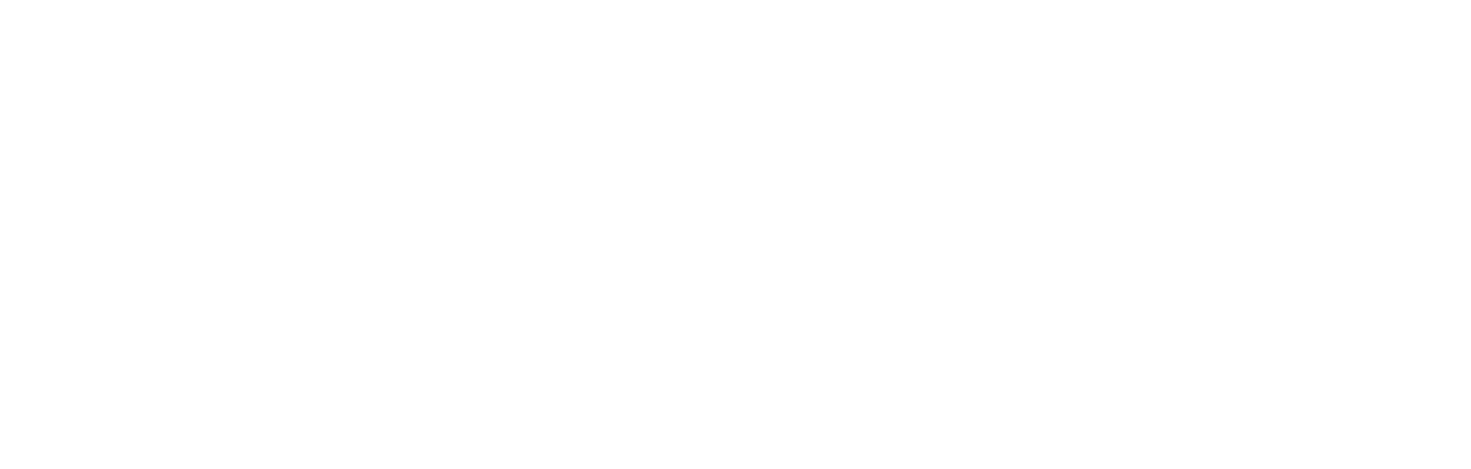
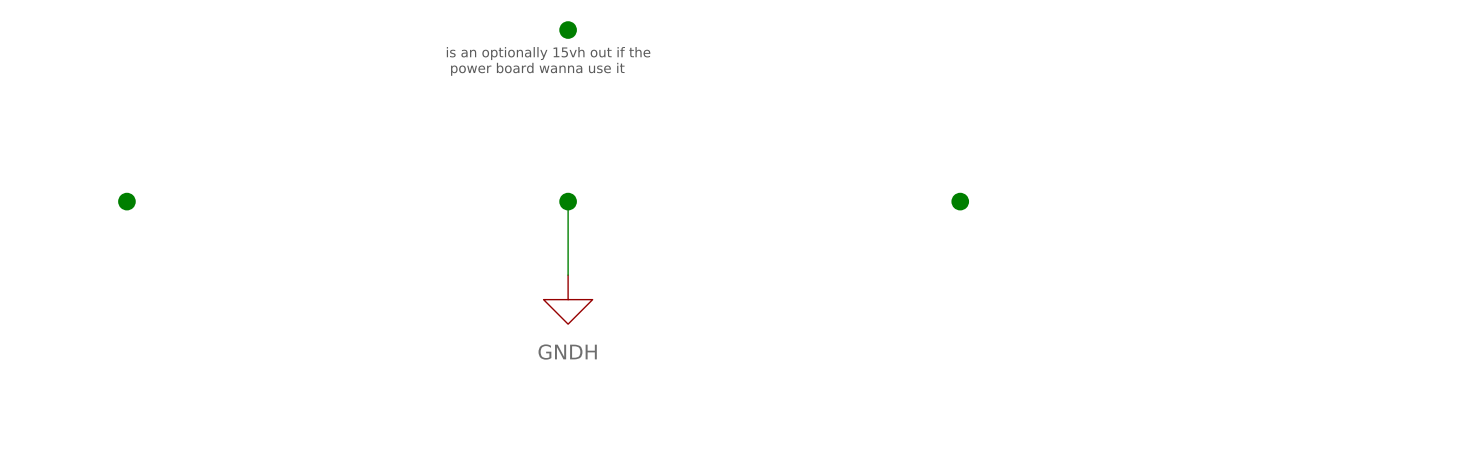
junction: none -> (568, 30)
text: none -> is an optionally 15vh out if the (548, 53)
text: none -> power board wanna use it (537, 69)
junction: none -> (126, 201)
wire: none -> (568, 201) (568, 275)
junction: none -> (568, 201)
junction: none -> (960, 201)
power symbol: none -> GNDH (568, 299)

